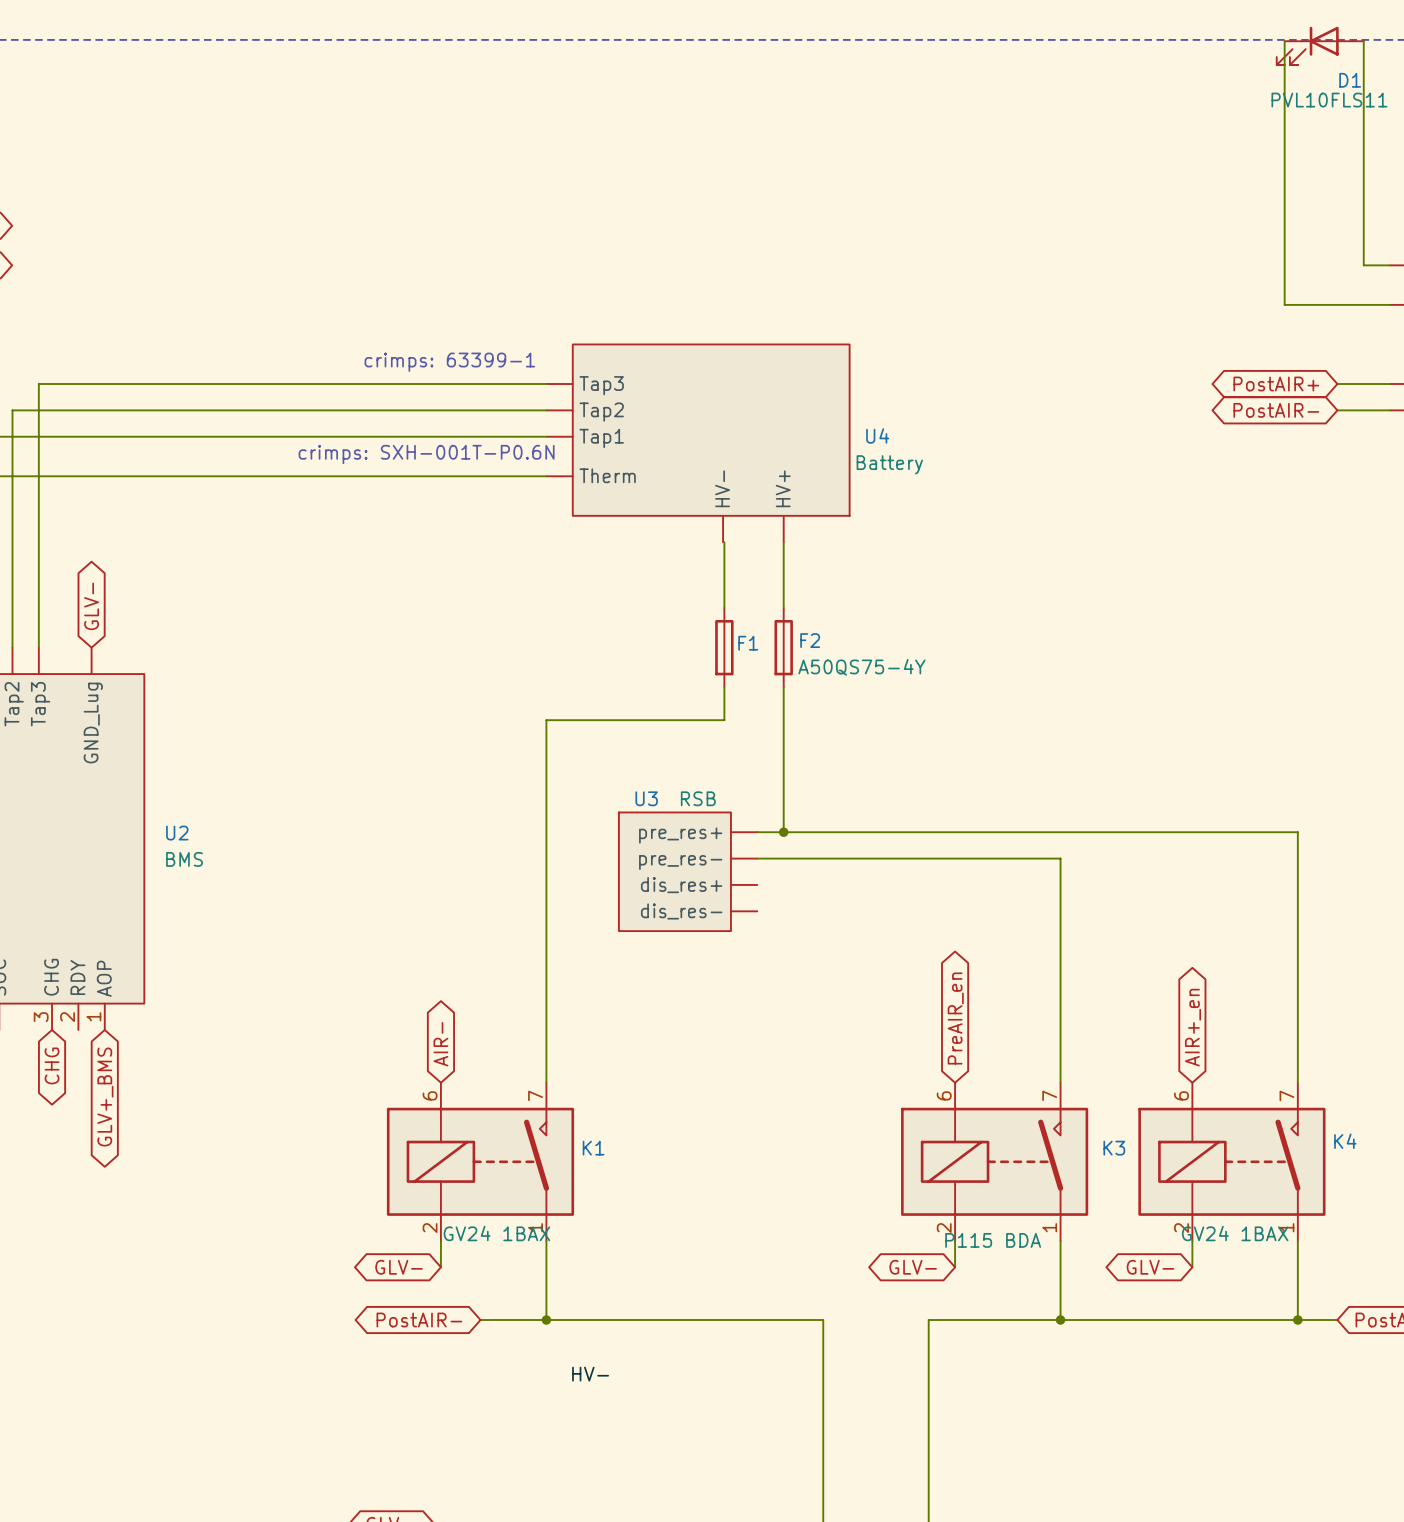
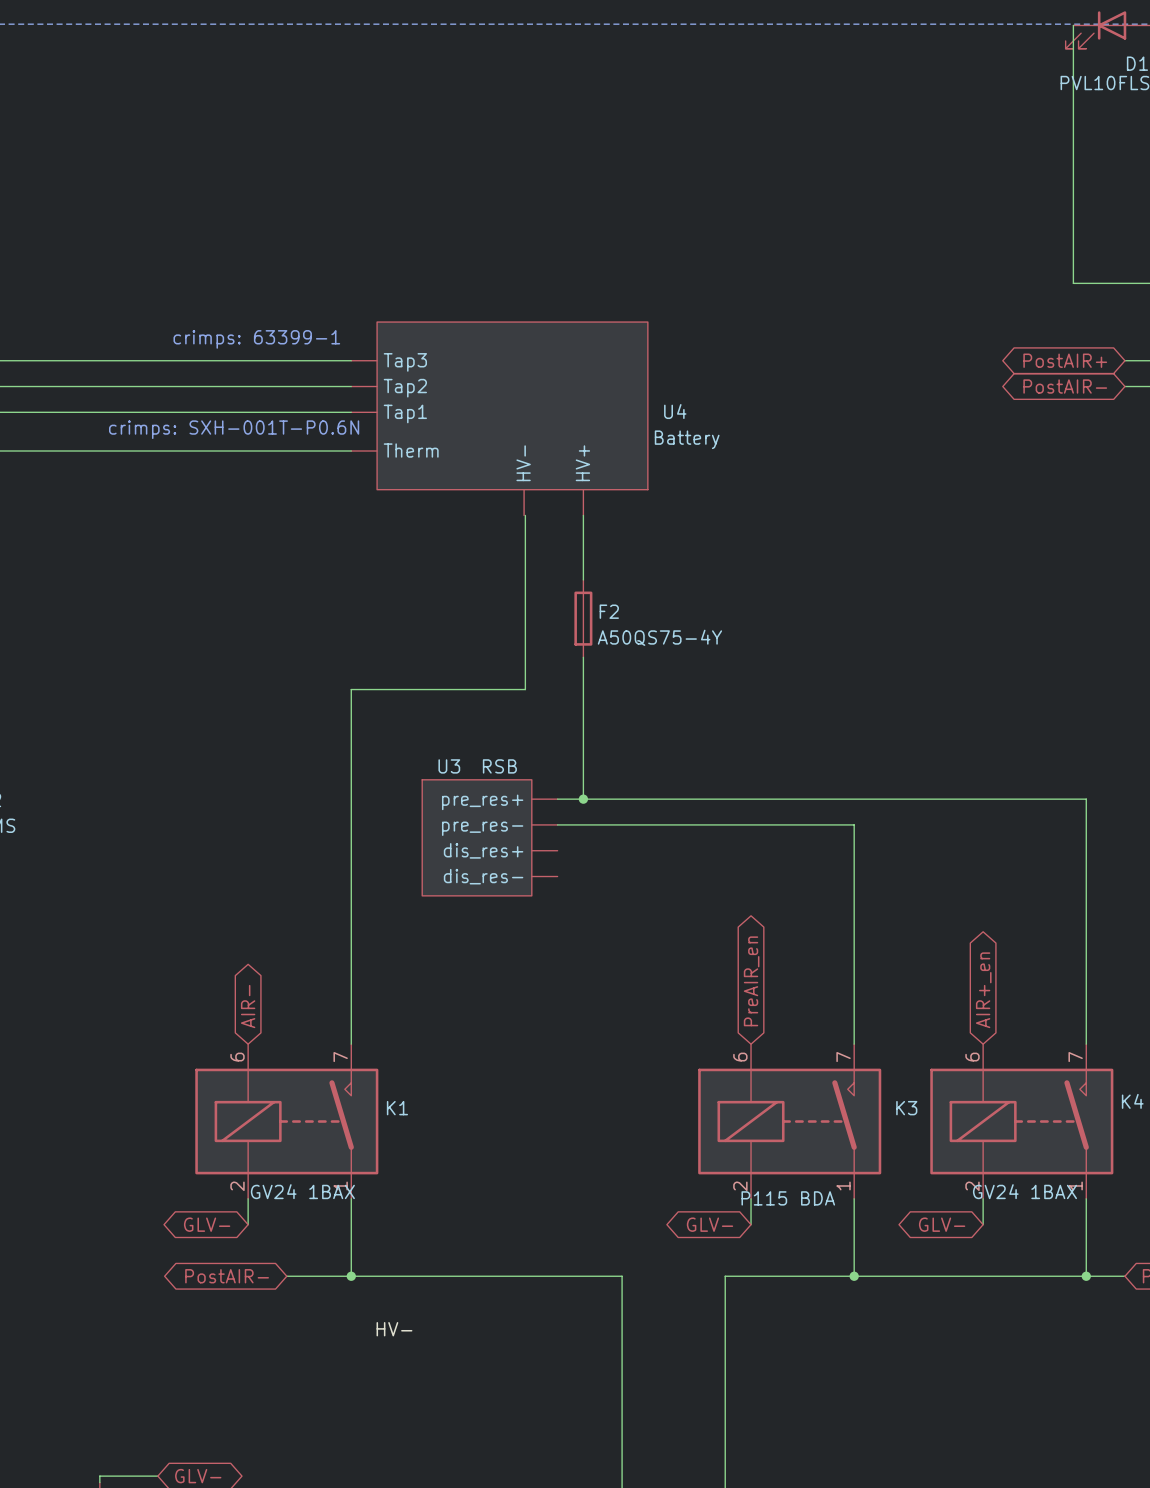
F1: (724, 647) -> none

